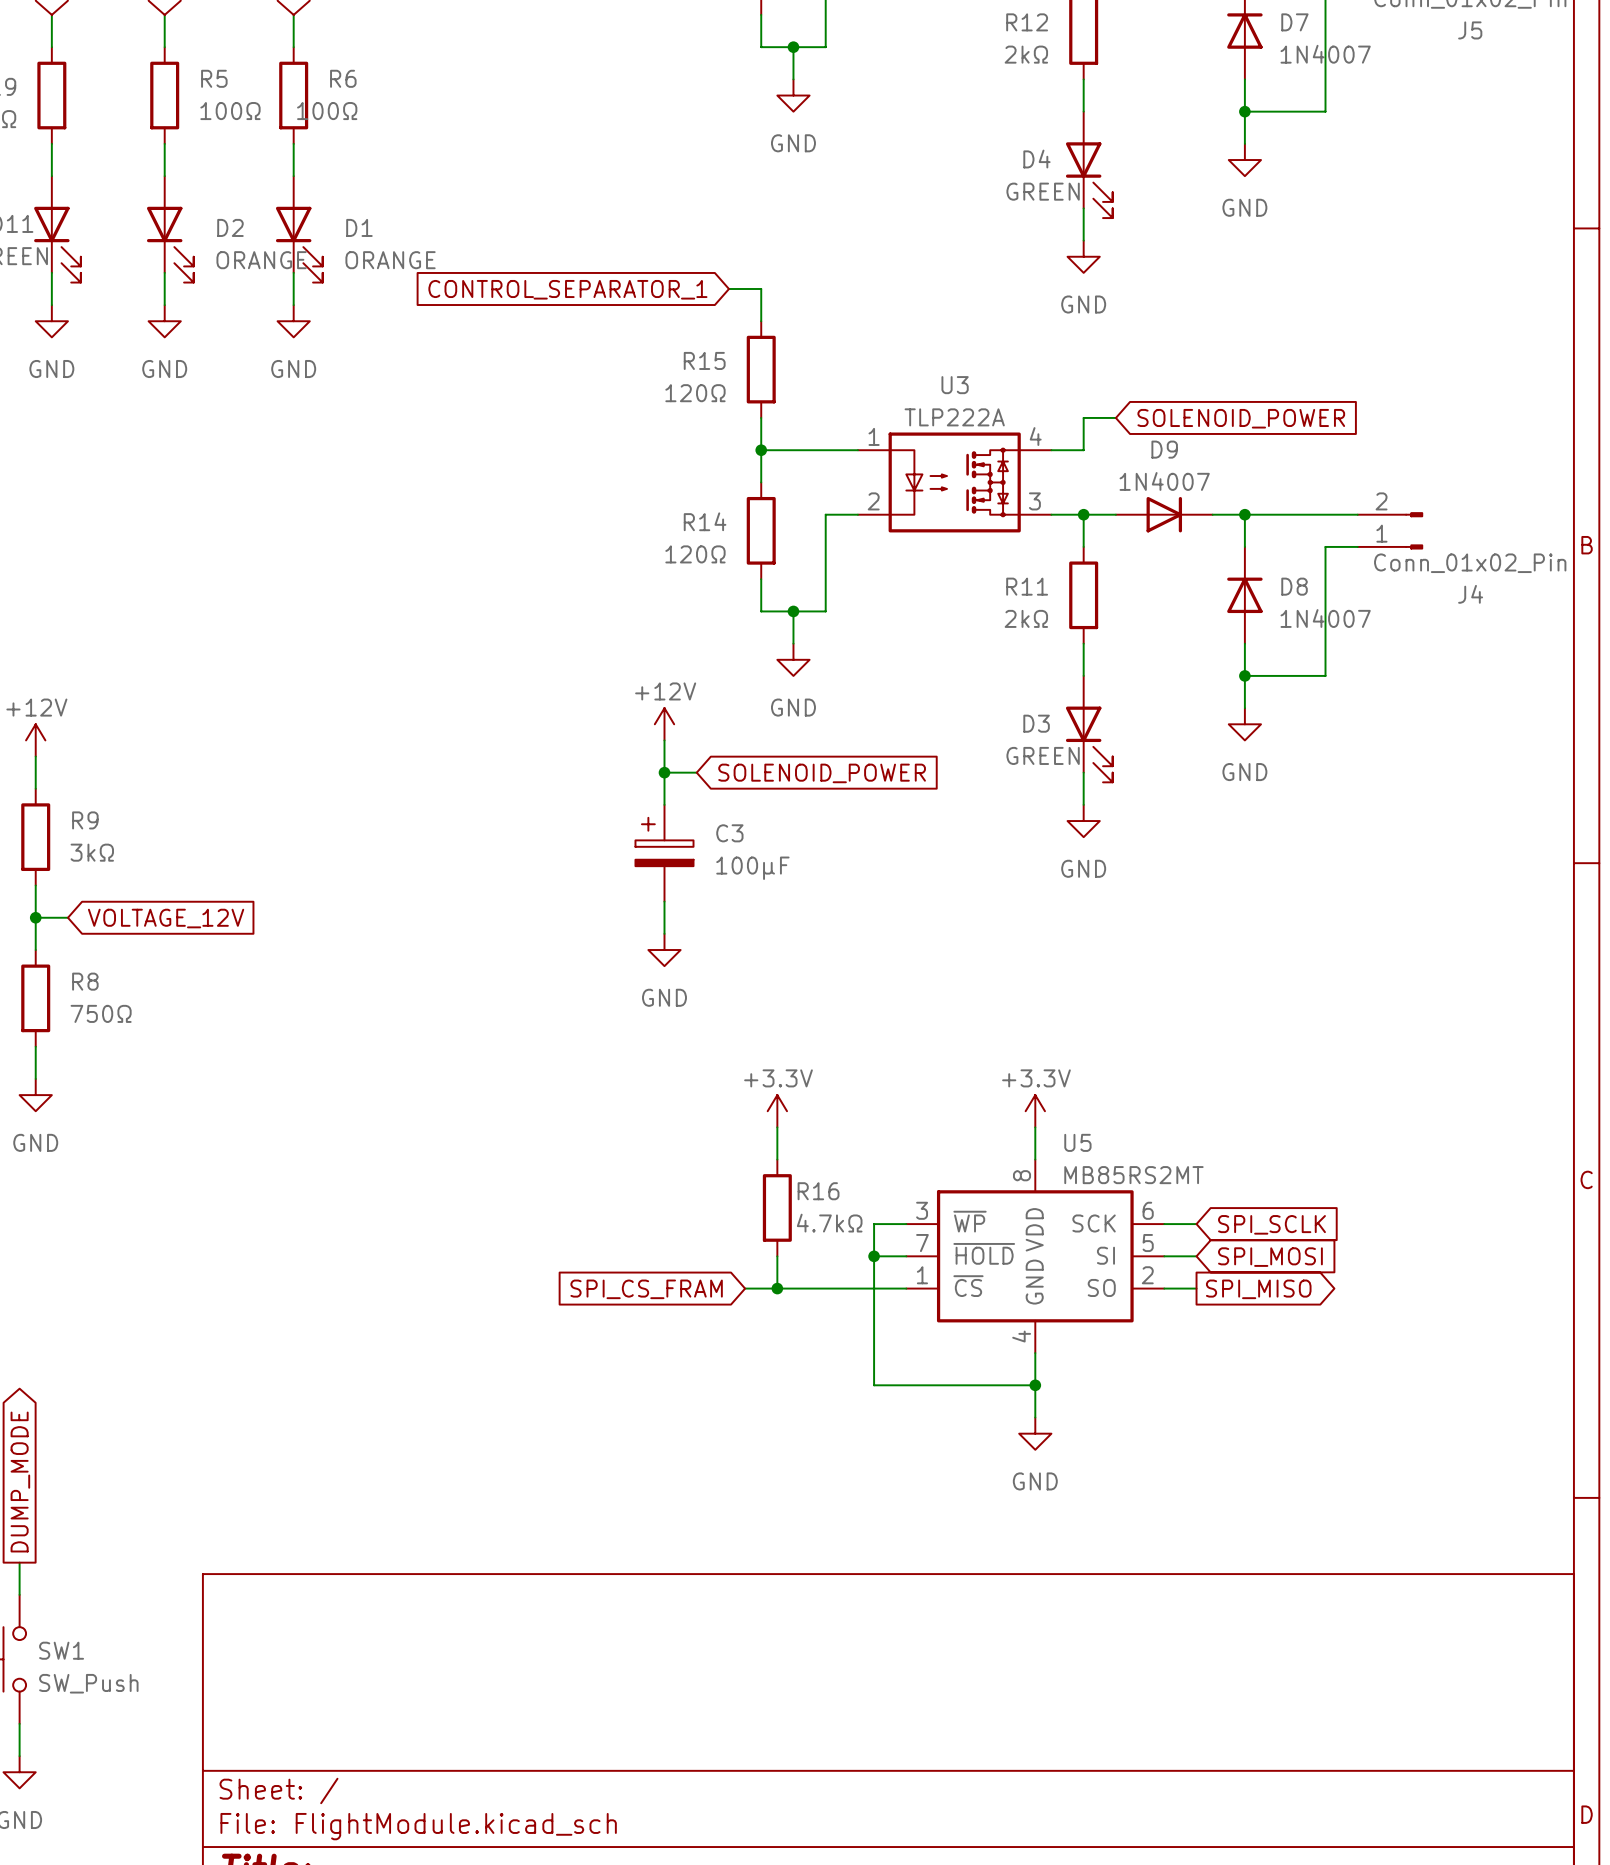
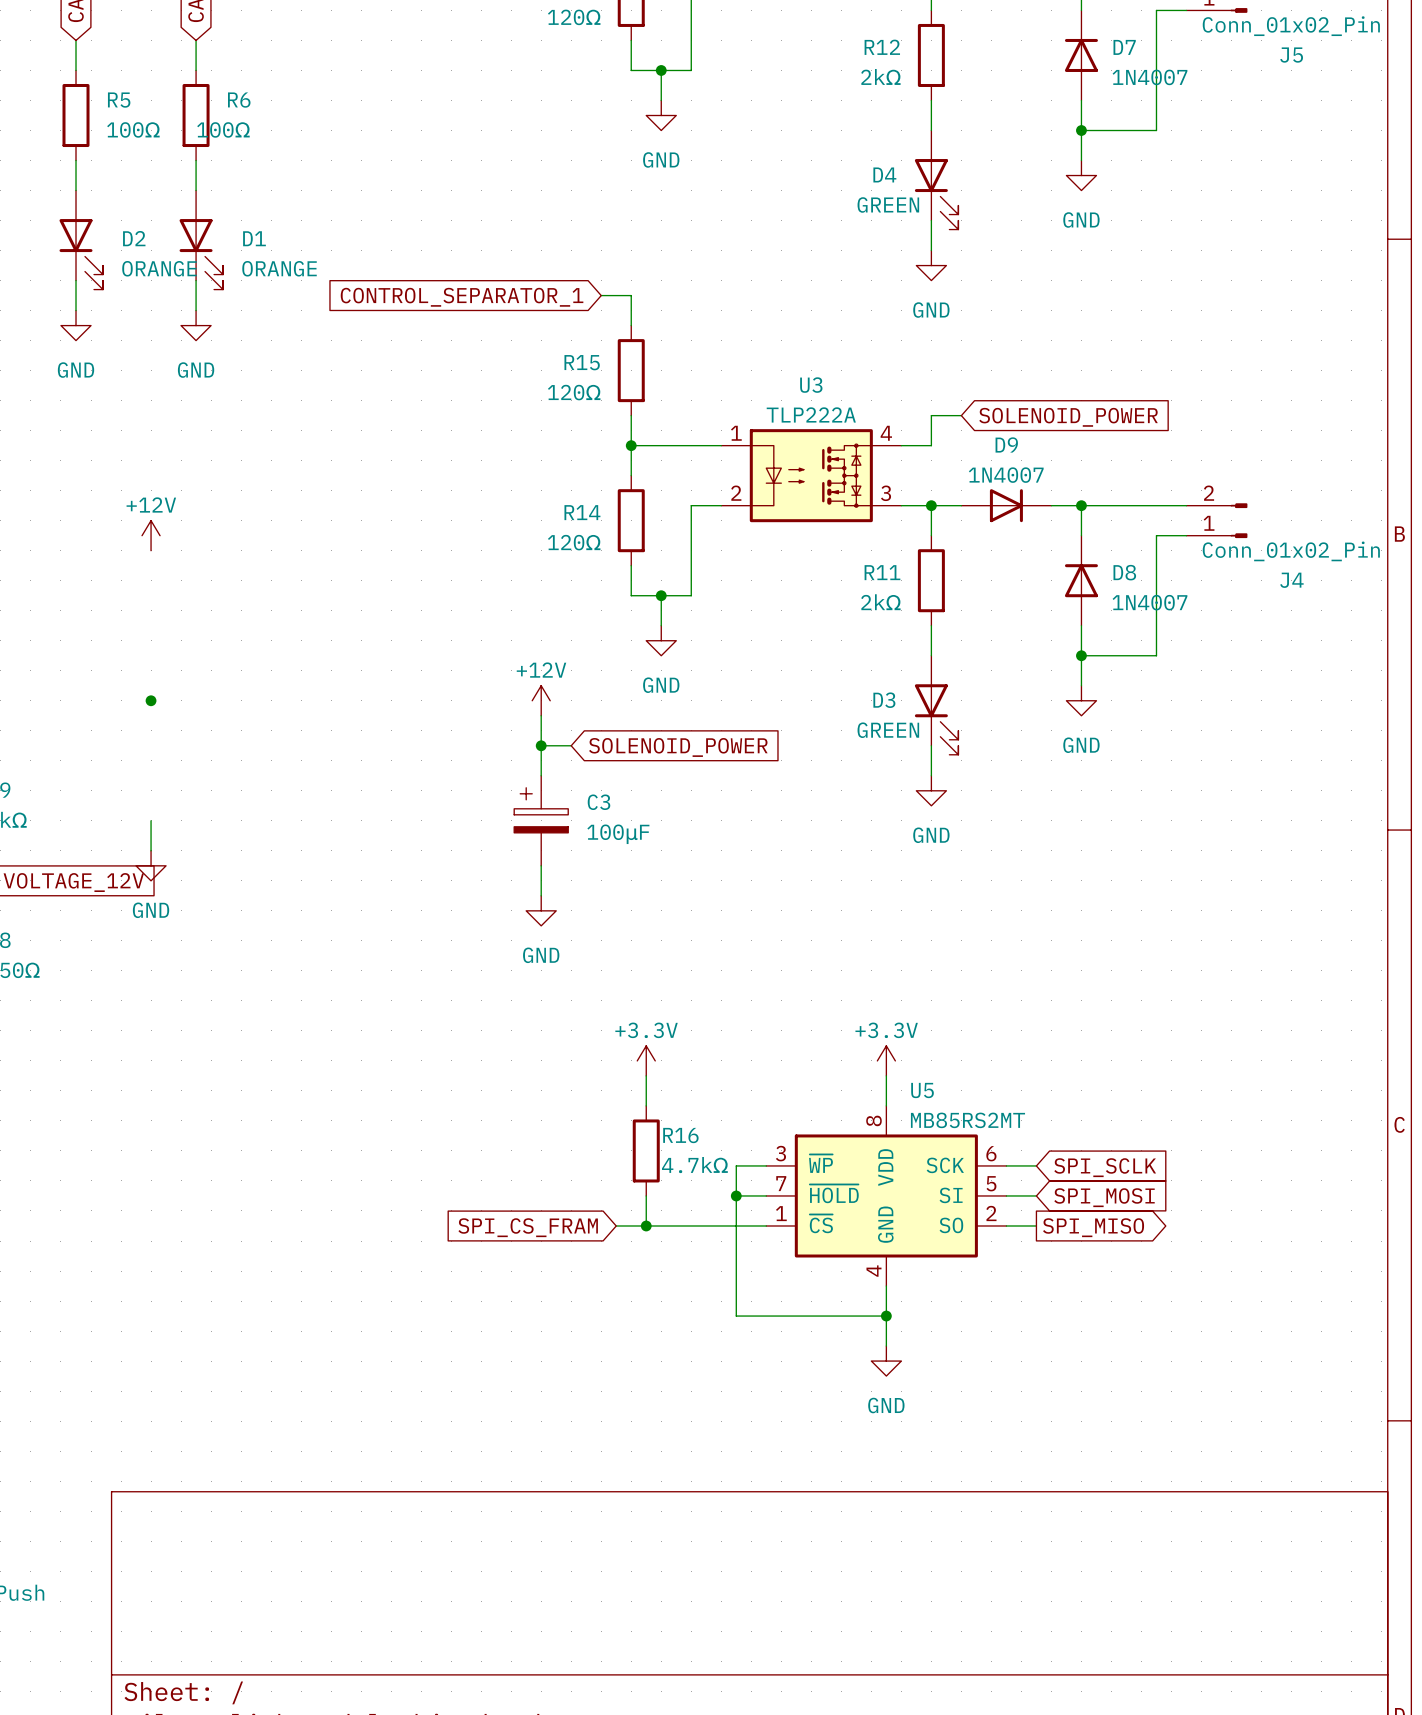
power symbol: none -> +12V (151, 535)
junction: none -> (151, 700)
wire: none -> (151, 820) (151, 850)
power symbol: none -> GND (151, 865)

